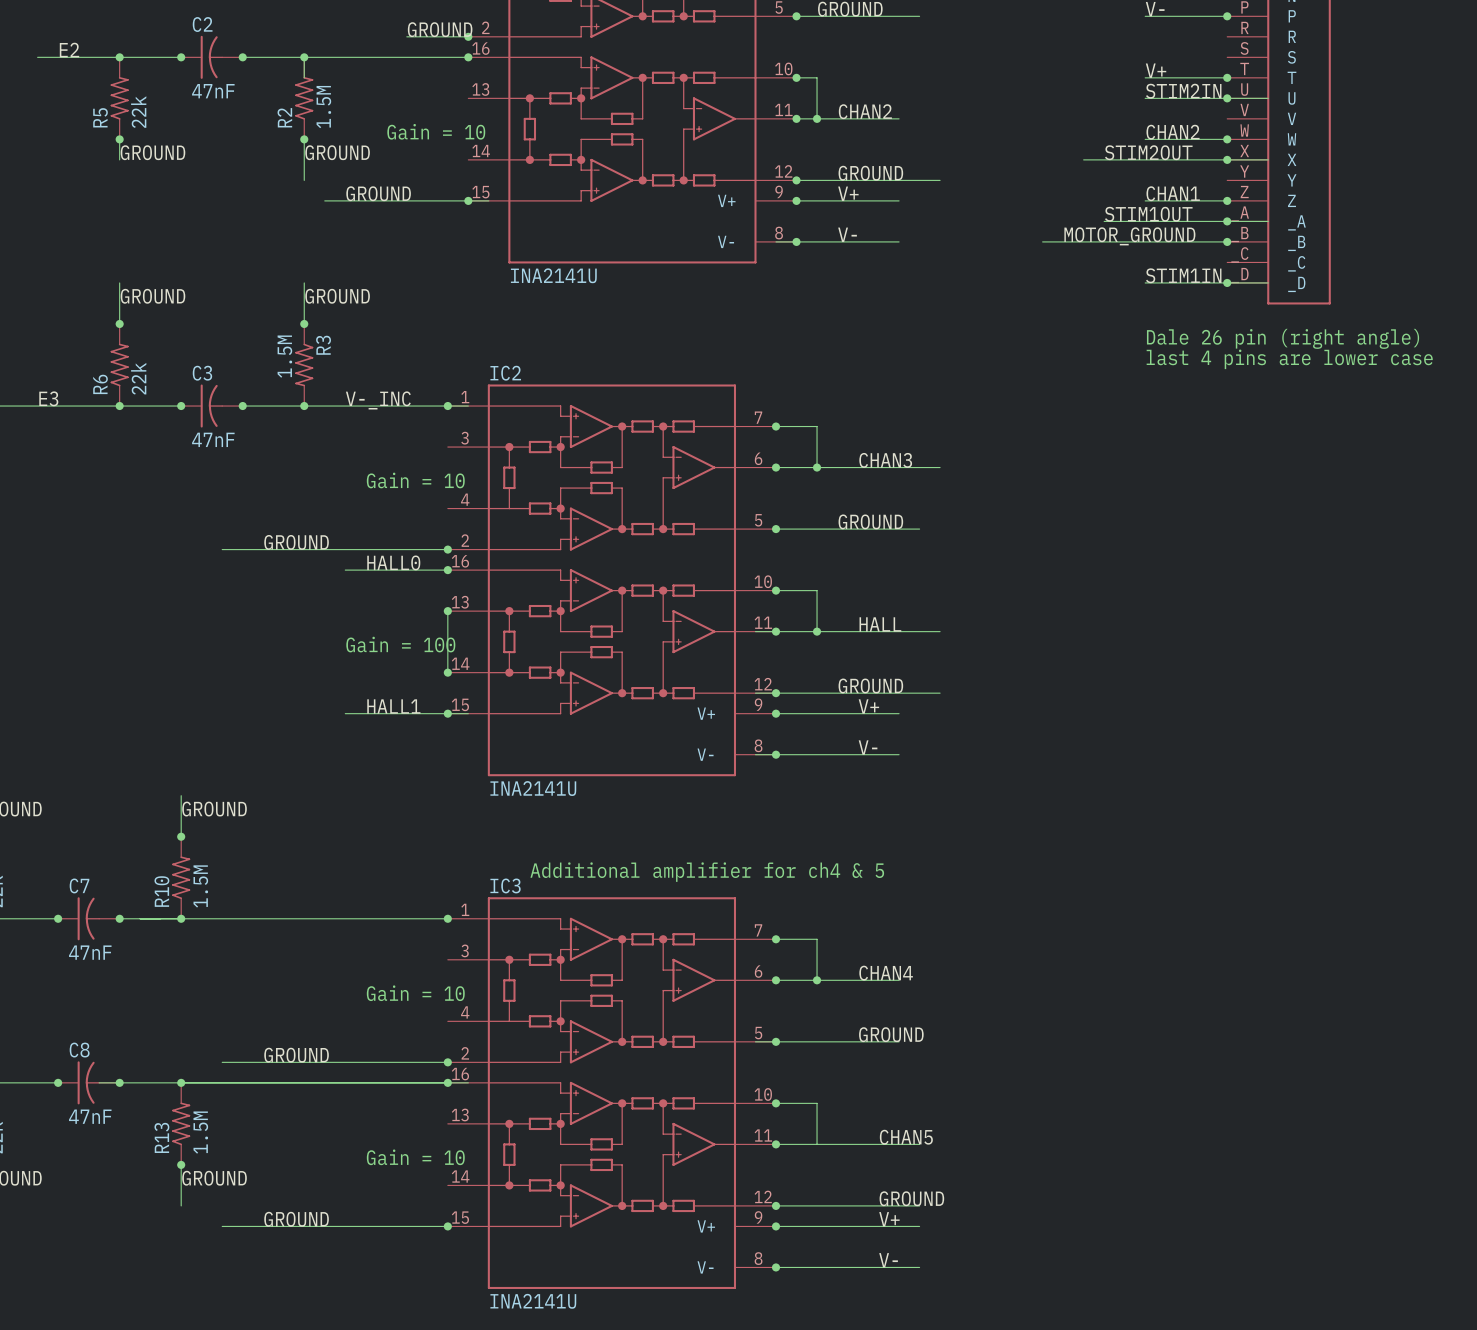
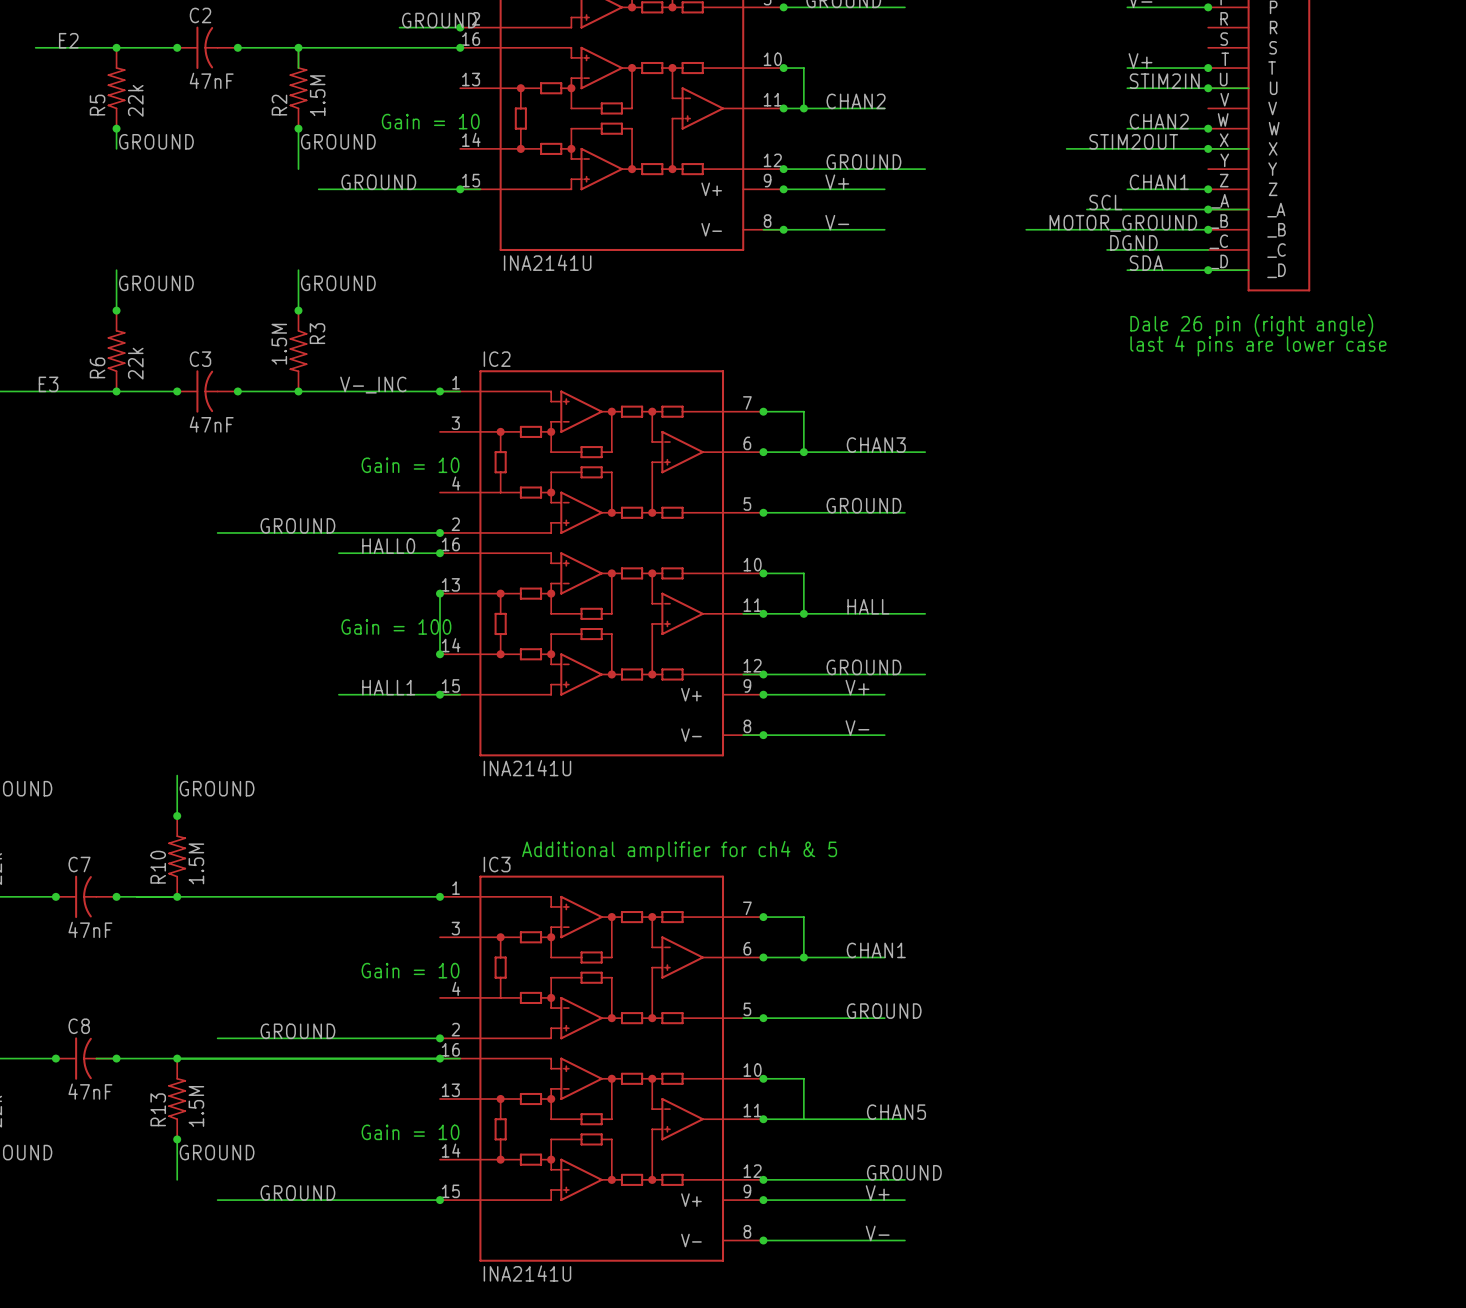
label: STIM1OUT (1148, 214) -> SCL (1105, 202)
label: none -> DGND (1133, 242)
wire: none -> (1107, 249) (1208, 249)
label: STIM1IN (1183, 275) -> SDA (1146, 263)
label: CHAN4 (886, 973) -> CHAN1 (876, 950)

